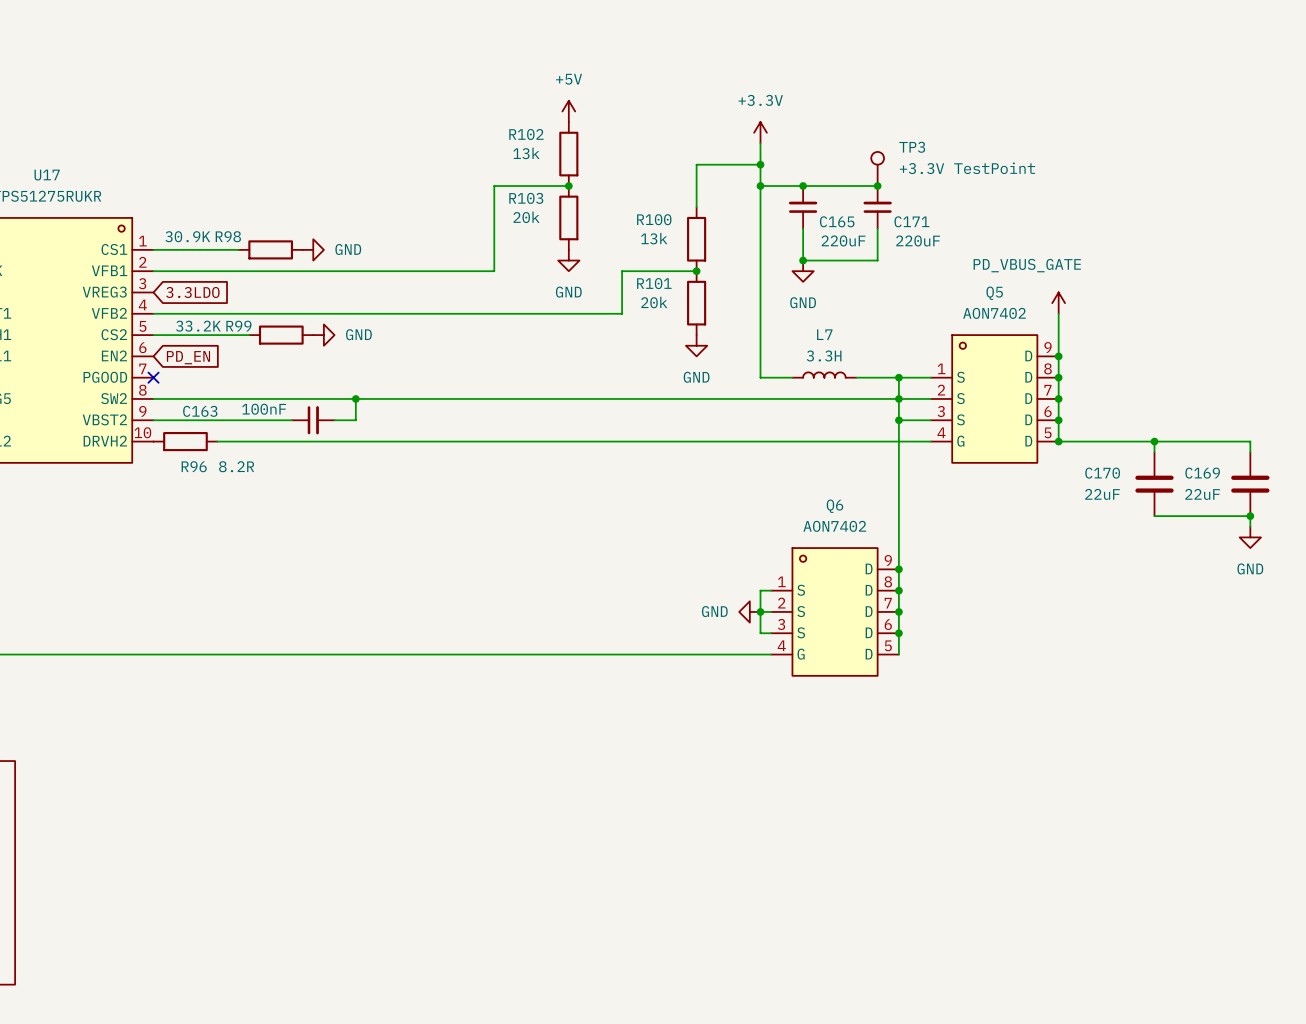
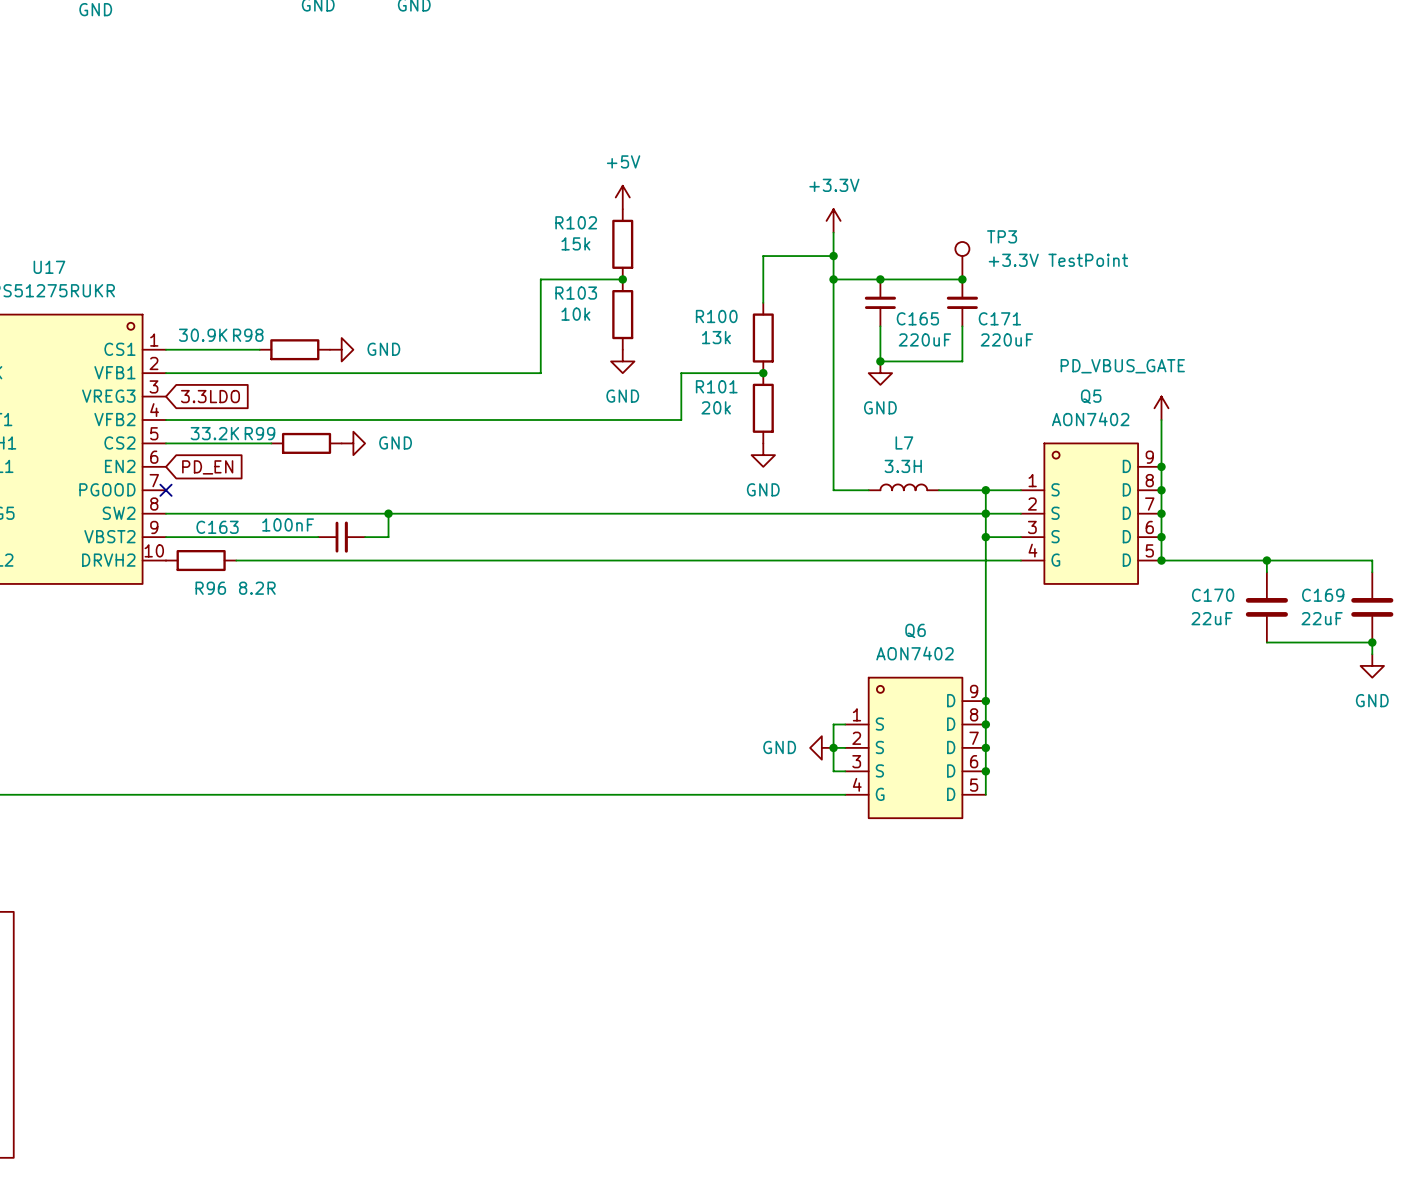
R102 value: 13k (526, 153) -> 15k (575, 243)
R103 value: 20k (526, 217) -> 10k (575, 314)

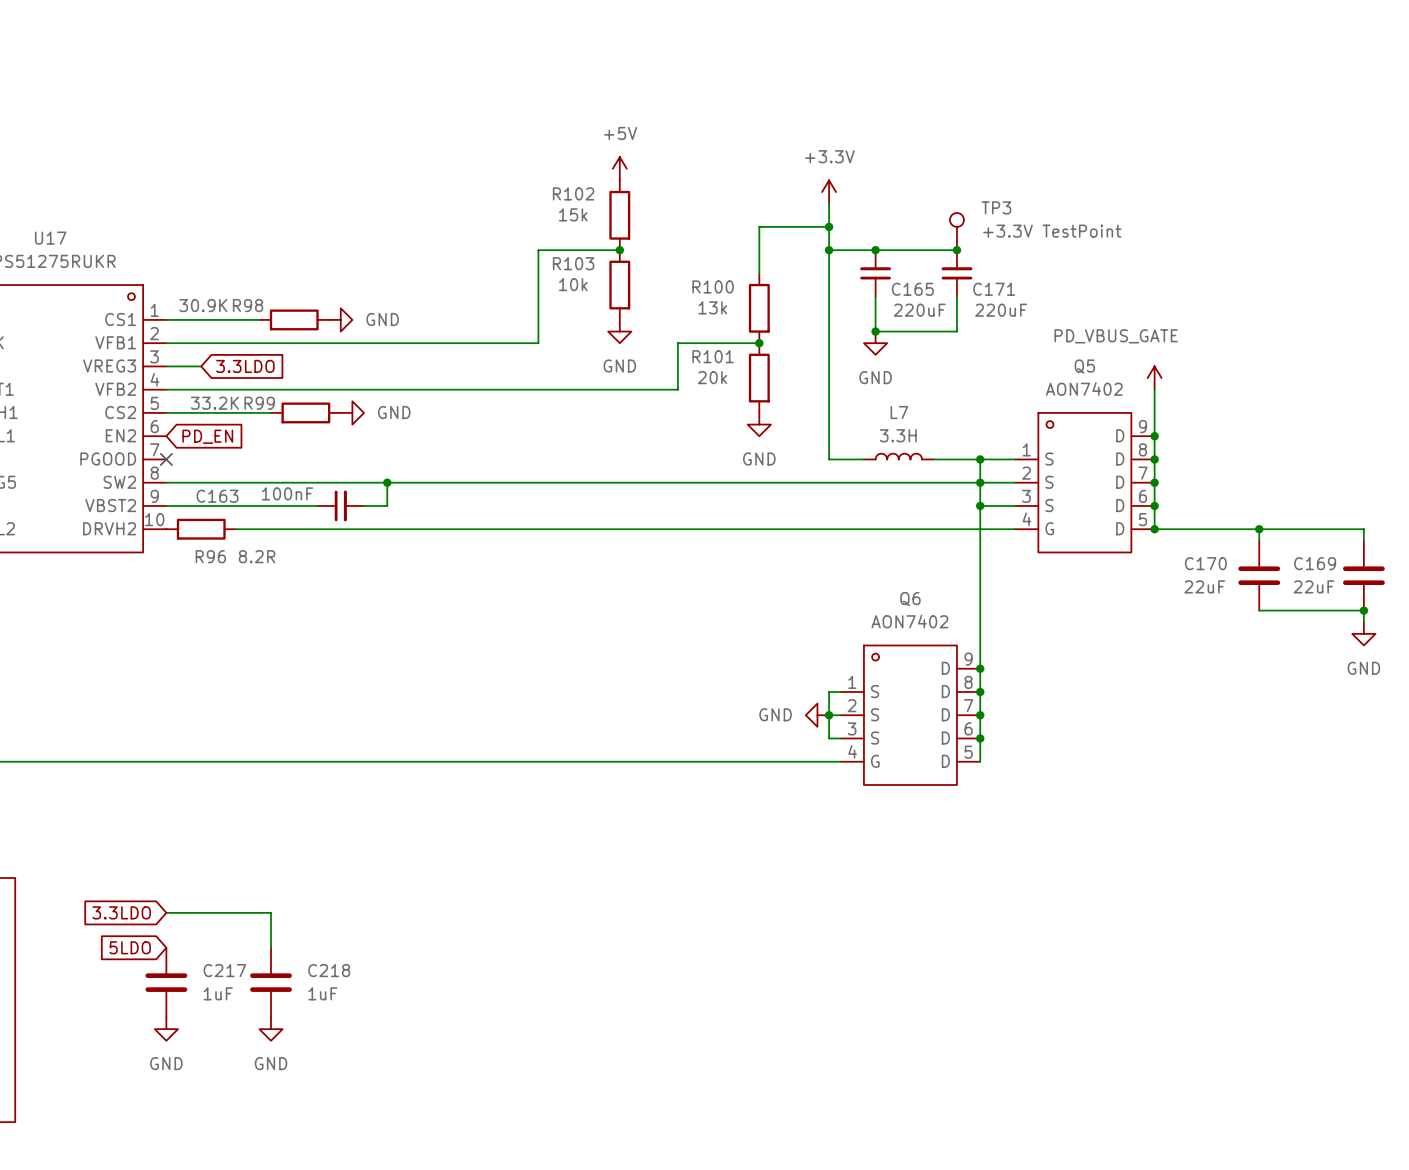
wire: none -> (166, 366) (201, 366)
global label position: 3.3LDO (210, 396) -> 3.3LDO (245, 366)
global label: none -> 3.3LDO (121, 912)
wire: none -> (166, 912) (271, 912) (271, 947)
global label: none -> 5LDO (130, 947)
C217: none -> 1uF (166, 982)
C218: none -> 1uF (271, 982)
power symbol: none -> GND (166, 1029)
power symbol: none -> GND (271, 1029)

